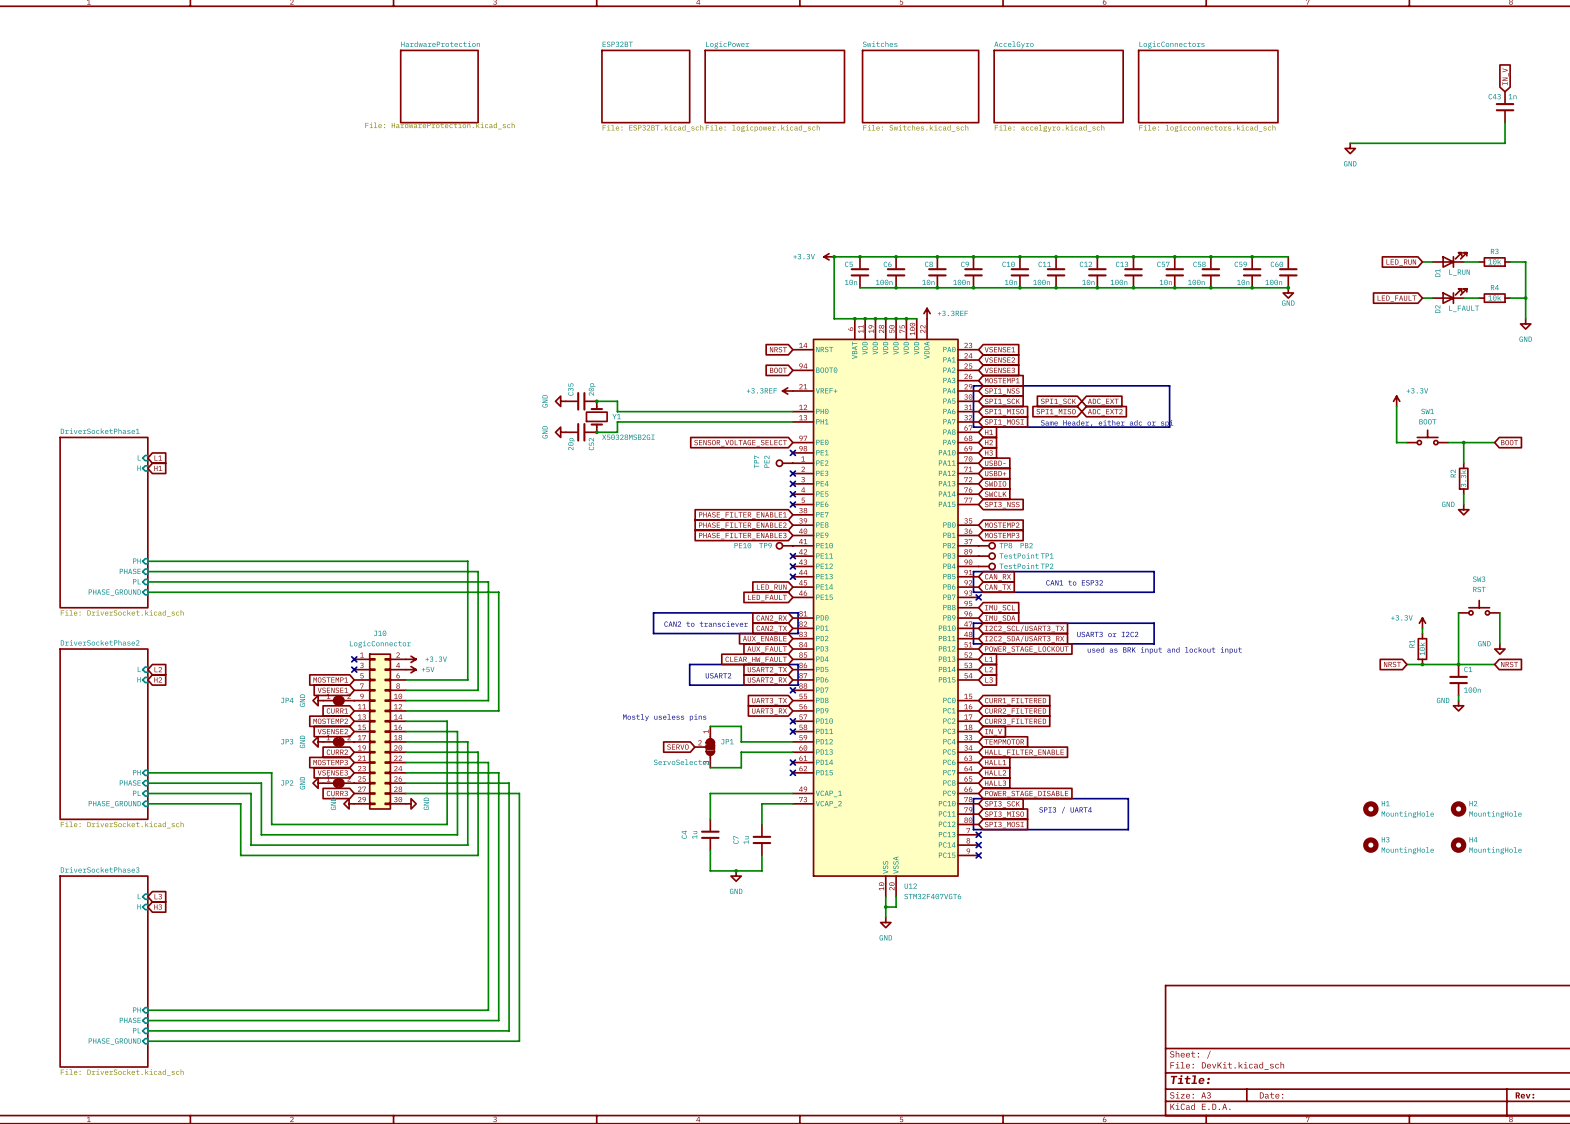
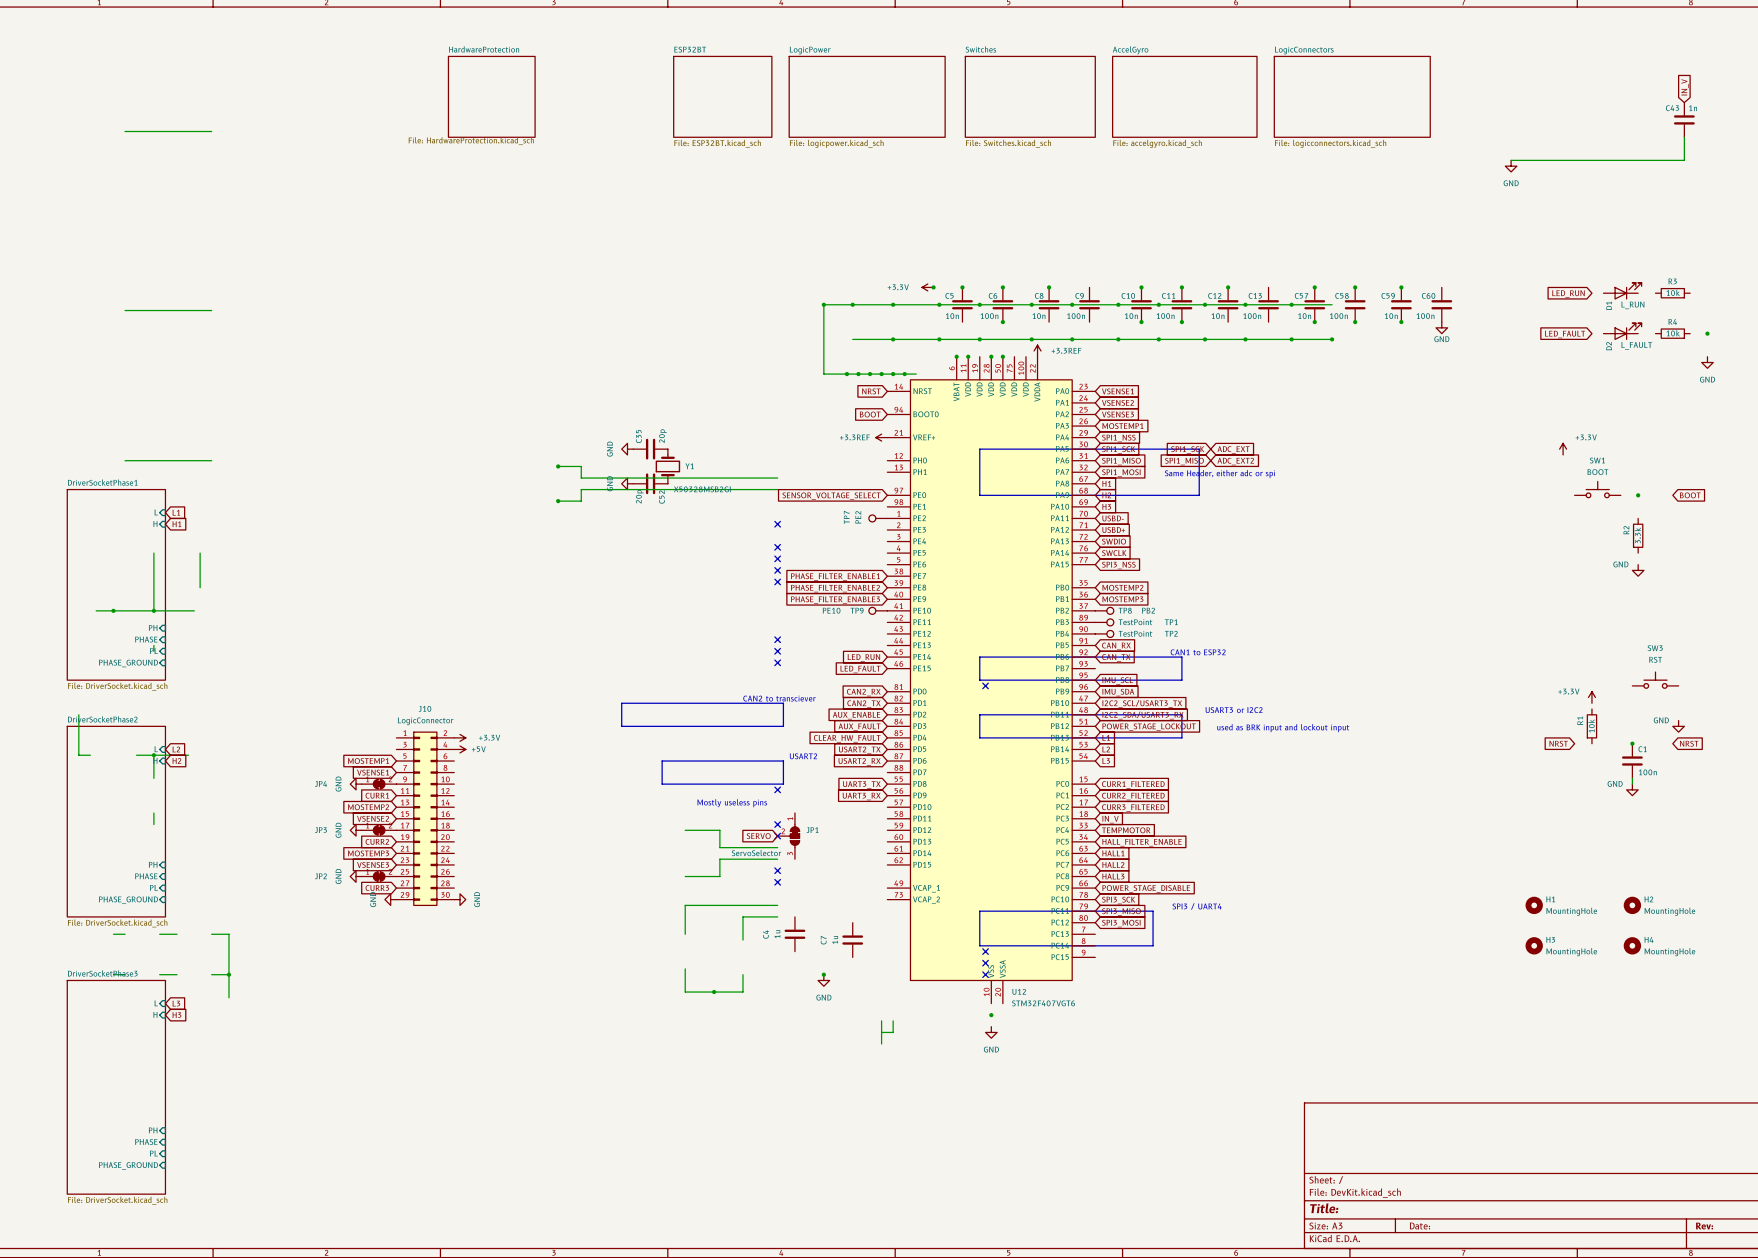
wire: none -> (125, 131) (211, 131)
junction: (973, 256) -> none
junction: (1133, 256) -> none
wire: (1288, 256) (834, 256) (834, 318) (916, 318) -> (1332, 304) (823, 304) (823, 374) (916, 374)
wire: (1422, 261) (1432, 261) -> none
wire: (1463, 261) (1479, 261) -> none
wire: (1510, 261) (1525, 261) (1525, 318) -> none
junction: none -> (823, 304)
junction: none -> (852, 304)
junction: none -> (893, 304)
junction: none -> (939, 304)
junction: none -> (979, 304)
junction: none -> (1031, 304)
junction: none -> (1072, 304)
junction: none -> (1118, 304)
junction: none -> (1158, 304)
junction: none -> (1205, 304)
junction: none -> (1245, 304)
junction: none -> (1291, 304)
wire: none -> (125, 310) (211, 310)
wire: (859, 287) (1288, 287) -> (852, 339) (1332, 339)
junction: (937, 287) -> none
junction: (973, 287) -> none
junction: (1097, 287) -> none
junction: (1133, 287) -> none
junction: (1288, 287) -> none
wire: (1422, 298) (1432, 298) -> none
wire: (1463, 298) (1479, 298) -> none
wire: (1510, 298) (1525, 298) -> none
junction: none -> (893, 339)
junction: none -> (939, 339)
junction: none -> (1031, 339)
junction: none -> (1072, 339)
junction: none -> (1118, 339)
junction: none -> (1158, 339)
junction: none -> (1205, 339)
junction: none -> (1245, 339)
junction: none -> (1291, 339)
junction: none -> (1332, 339)
junction position: (875, 318) -> (979, 339)
junction: (906, 318) -> none
junction: none -> (846, 374)
junction: none -> (858, 374)
junction: none -> (870, 374)
junction: none -> (881, 374)
junction: none -> (893, 374)
junction: none -> (904, 374)
line: (973, 385) (973, 427) (1169, 427) (1169, 385) (973, 385) -> (979, 449) (979, 495) (1199, 495) (1199, 449) (979, 449)
wire: (596, 401) (617, 401) (617, 411) (792, 411) -> (558, 466) (581, 466) (581, 478) (777, 478)
junction: (596, 401) -> none
wire: (1396, 406) (1396, 442) (1406, 442) -> none
wire: none -> (125, 460) (211, 460)
junction: none -> (558, 466)
wire: (792, 421) (617, 421) (617, 432) (596, 432) -> (777, 489) (581, 489) (581, 501) (558, 501)
junction: (596, 432) -> none
wire: (1448, 442) (1494, 442) -> none
wire: (1463, 442) (1463, 463) -> none
junction: none -> (558, 501)
no-connect mark: (792, 452) -> none
no-connect mark: none -> (777, 524)
no-connect mark: (792, 473) -> none
no-connect mark: (792, 483) -> none
no-connect mark: none -> (777, 547)
wire: none -> (153, 553) (153, 610)
wire: none -> (200, 553) (200, 587)
no-connect mark: (792, 494) -> none
wire: (1463, 494) (1463, 504) -> none
no-connect mark: none -> (777, 558)
no-connect mark: (792, 504) -> none
no-connect mark: none -> (777, 570)
no-connect mark: none -> (777, 581)
wire: none -> (96, 610) (194, 610)
junction: none -> (113, 610)
junction: none -> (153, 610)
no-connect mark: (792, 556) -> none
wire: (147, 561) (467, 561) (467, 679) (405, 679) -> none
no-connect mark: (792, 566) -> none
wire: (147, 571) (478, 571) (478, 690) (405, 690) -> none
no-connect mark: none -> (777, 639)
line: (973, 571) (973, 592) (1154, 592) (1154, 571) (973, 571) -> (979, 657) (979, 680) (1181, 680) (1181, 657) (979, 657)
wire: none -> (153, 645) (153, 651)
no-connect mark: (792, 576) -> none
wire: (147, 581) (488, 581) (488, 700) (405, 700) -> none
no-connect mark: none -> (777, 651)
wire: (147, 592) (498, 592) (498, 710) (405, 710) -> none
no-connect mark: none -> (777, 662)
no-connect mark: (978, 597) -> none
line: (653, 612) (798, 612) (798, 633) (653, 633) (653, 612) -> (621, 703) (783, 703) (783, 726) (621, 726) (621, 703)
no-connect mark: none -> (985, 685)
wire: (1458, 612) (1458, 664) -> none
wire: (1499, 612) (1499, 643) -> none
line: (973, 623) (1154, 623) (1154, 643) (973, 643) (973, 623) -> (979, 714) (1181, 714) (1181, 737) (979, 737) (979, 714)
wire: (1422, 628) (1422, 633) -> none
wire: none -> (78, 714) (78, 755) (90, 755)
no-connect mark: (354, 659) -> none
line: (689, 664) (798, 664) (798, 685) (689, 685) (689, 664) -> (662, 761) (783, 761) (783, 784) (662, 784) (662, 761)
wire: (1406, 664) (1494, 664) -> none
junction: (1422, 664) -> none
no-connect mark: (354, 669) -> none
wire: none -> (136, 755) (188, 755)
wire: none -> (153, 755) (153, 778)
junction: none -> (153, 755)
no-connect mark: (792, 690) -> none
no-connect mark: none -> (777, 789)
wire: (405, 721) (447, 721) (447, 824) (271, 824) (271, 772) (147, 772) -> none
no-connect mark: (792, 721) -> none
wire: none -> (153, 812) (153, 824)
wire: (710, 726) (741, 726) (741, 741) (792, 741) -> (685, 830) (719, 830) (719, 847) (777, 847)
wire: (405, 731) (457, 731) (457, 834) (261, 834) (261, 783) (147, 783) -> none
no-connect mark: (792, 731) -> none
no-connect mark: none -> (777, 824)
wire: (405, 741) (467, 741) (467, 845) (251, 845) (251, 793) (147, 793) -> none
no-connect mark: none -> (777, 836)
wire: (405, 752) (478, 752) (478, 855) (240, 855) (240, 803) (147, 803) -> none
wire: (792, 752) (741, 752) (741, 767) (710, 767) -> (777, 859) (719, 859) (719, 876) (685, 876)
wire: (405, 762) (488, 762) (488, 1010) (147, 1010) -> none
no-connect mark: (792, 762) -> none
wire: (405, 772) (498, 772) (498, 1020) (147, 1020) -> none
no-connect mark: (792, 772) -> none
no-connect mark: none -> (777, 870)
wire: (405, 783) (509, 783) (509, 1030) (147, 1030) -> none
no-connect mark: none -> (777, 882)
wire: (405, 793) (519, 793) (519, 1041) (147, 1041) -> none
wire: (792, 793) (710, 793) (710, 819) -> (777, 905) (685, 905) (685, 934)
line: (973, 798) (973, 829) (1128, 829) (1128, 798) (973, 798) -> (979, 911) (979, 945) (1153, 945) (1153, 911) (979, 911)
wire: (792, 803) (761, 803) (761, 824) -> (777, 916) (742, 916) (742, 940)
wire: none -> (113, 934) (125, 934)
wire: none -> (159, 934) (177, 934)
wire: none -> (211, 934) (228, 934) (228, 997)
no-connect mark: (978, 834) -> none
no-connect mark: (978, 845) -> none
wire: (710, 850) (710, 870) (761, 870) (761, 855) -> (685, 968) (685, 992) (742, 992) (742, 974)
no-connect mark: none -> (985, 951)
no-connect mark: (978, 855) -> none
no-connect mark: none -> (985, 963)
wire: none -> (113, 974) (125, 974)
wire: none -> (159, 974) (177, 974)
wire: none -> (211, 974) (228, 974)
junction: none -> (228, 974)
no-connect mark: none -> (985, 974)
junction: none -> (714, 992)
wire: (885, 896) (885, 917) -> (881, 1020) (881, 1044)
wire: (896, 896) (896, 907) (885, 907) -> (893, 1020) (893, 1032) (881, 1032)

